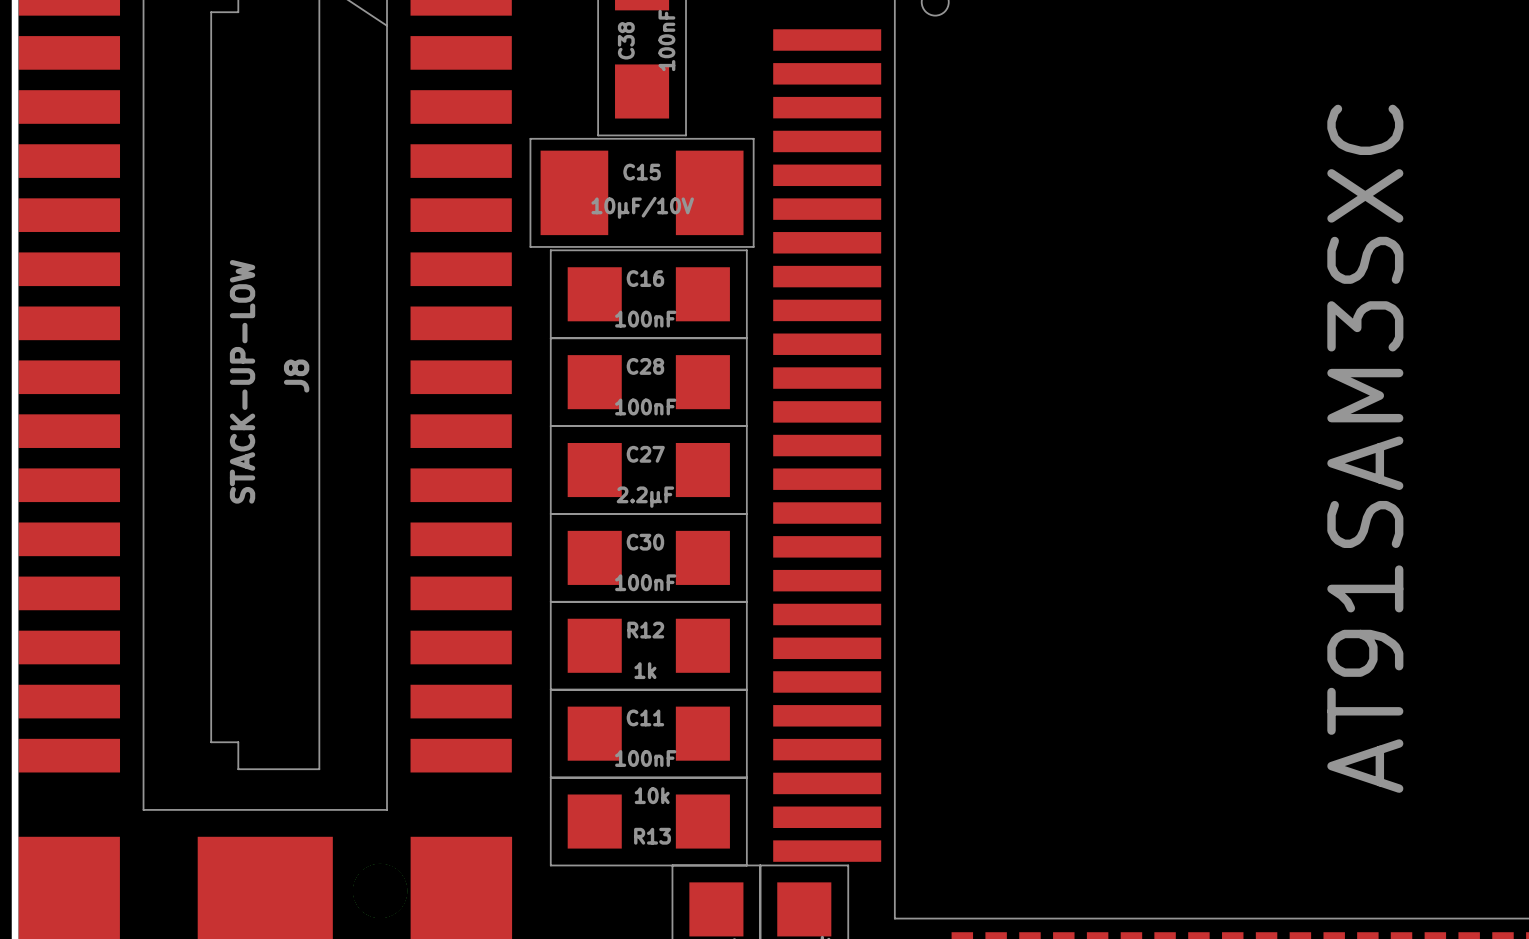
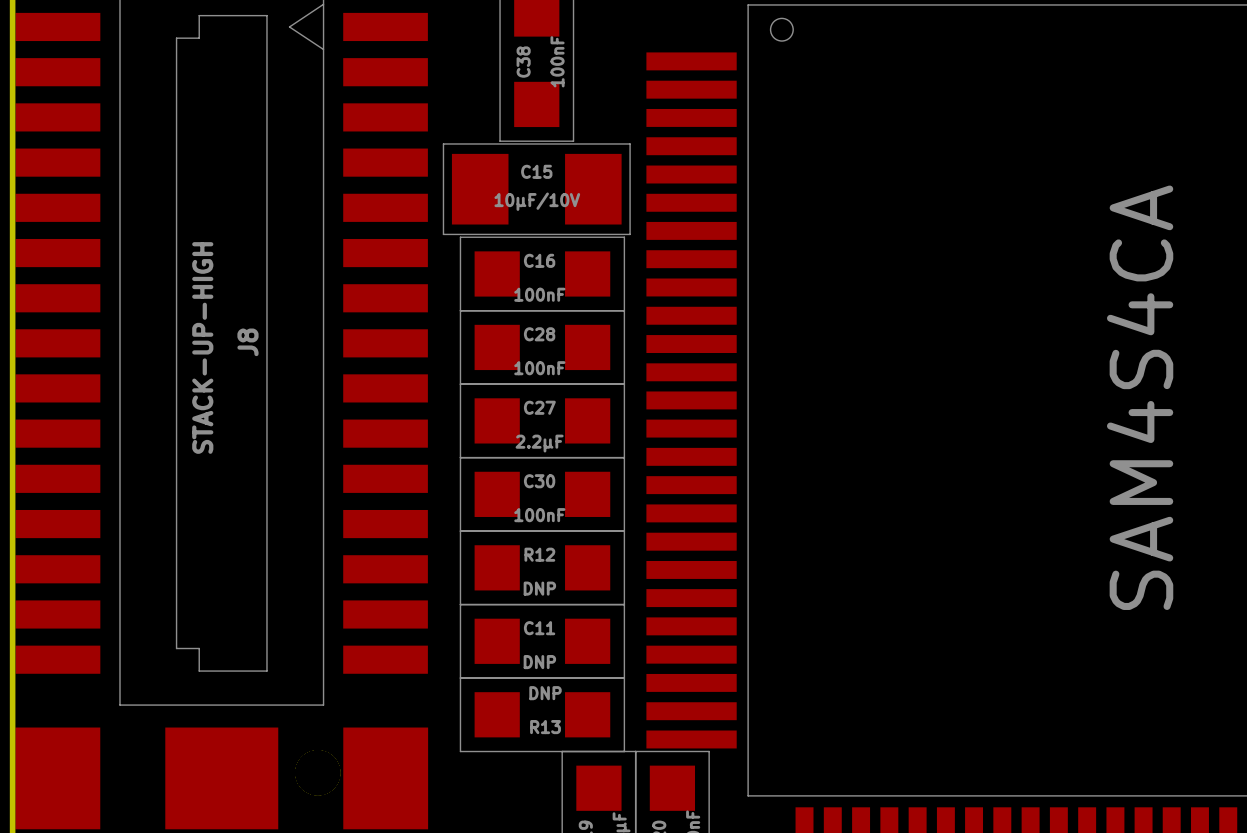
J8 value: STACK-UP-LOW (242, 381) -> STACK-UP-HIGH (202, 347)
part value: AT91SAM3SXC (1365, 448) -> SAM4S4CA (1140, 397)
R12 value: 1k (645, 670) -> DNP (539, 588)
C11 value: 100nF (645, 758) -> DNP (539, 662)
R13 value: 10k (652, 795) -> DNP (545, 693)

